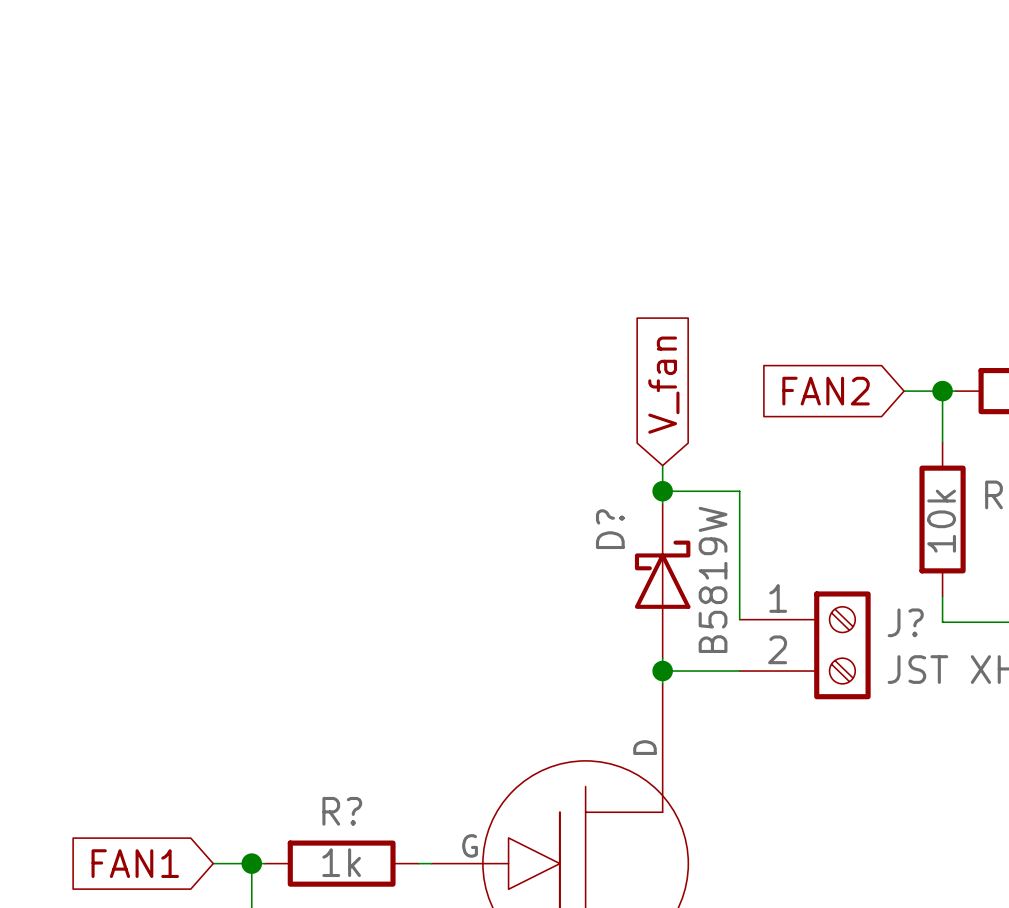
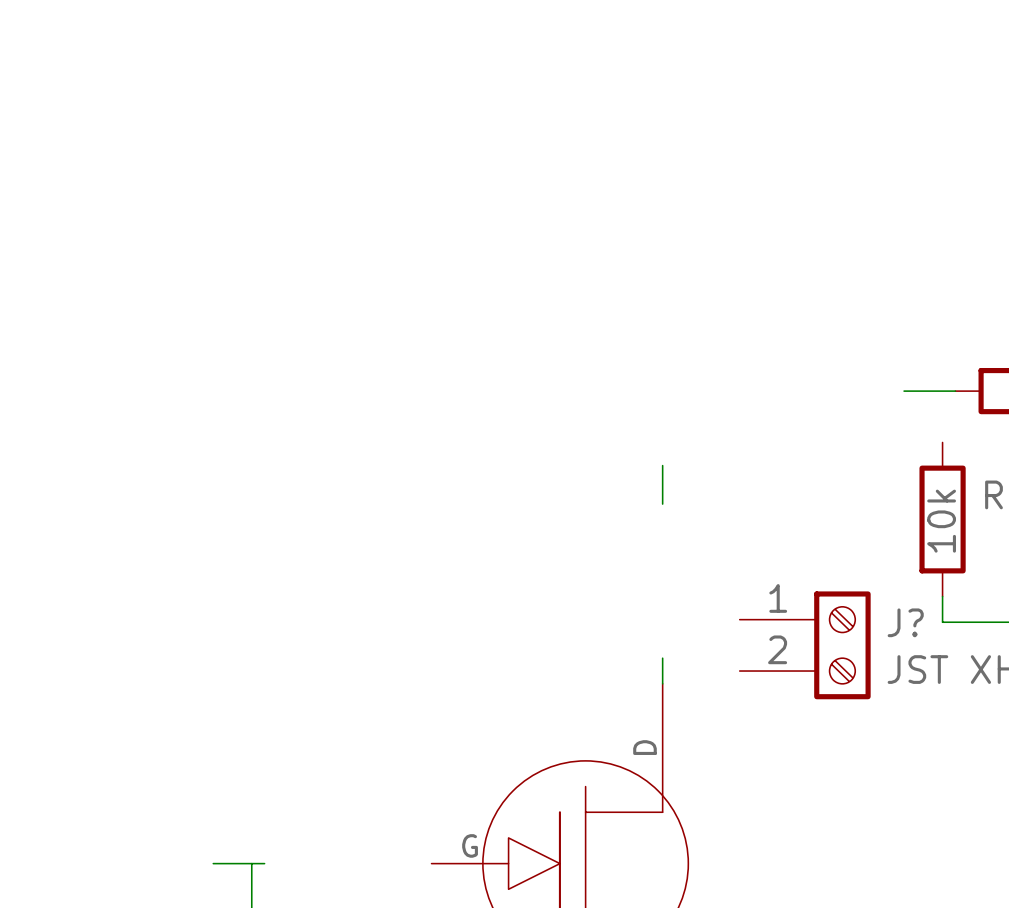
global label: V_fan (663, 385) -> none
global label: FAN2 (826, 391) -> none
wire: (942, 391) (942, 442) -> none
junction: (942, 391) -> none
wire: (662, 491) (739, 491) (739, 619) -> none
junction: (662, 491) -> none
D?: B5819W (662, 581) -> none
wire: (662, 671) (739, 671) -> none
junction: (662, 671) -> none
global label: FAN1 (135, 863) -> none
junction: (251, 863) -> none
R?: 1k (341, 863) -> none
wire: (418, 863) (431, 863) -> none

